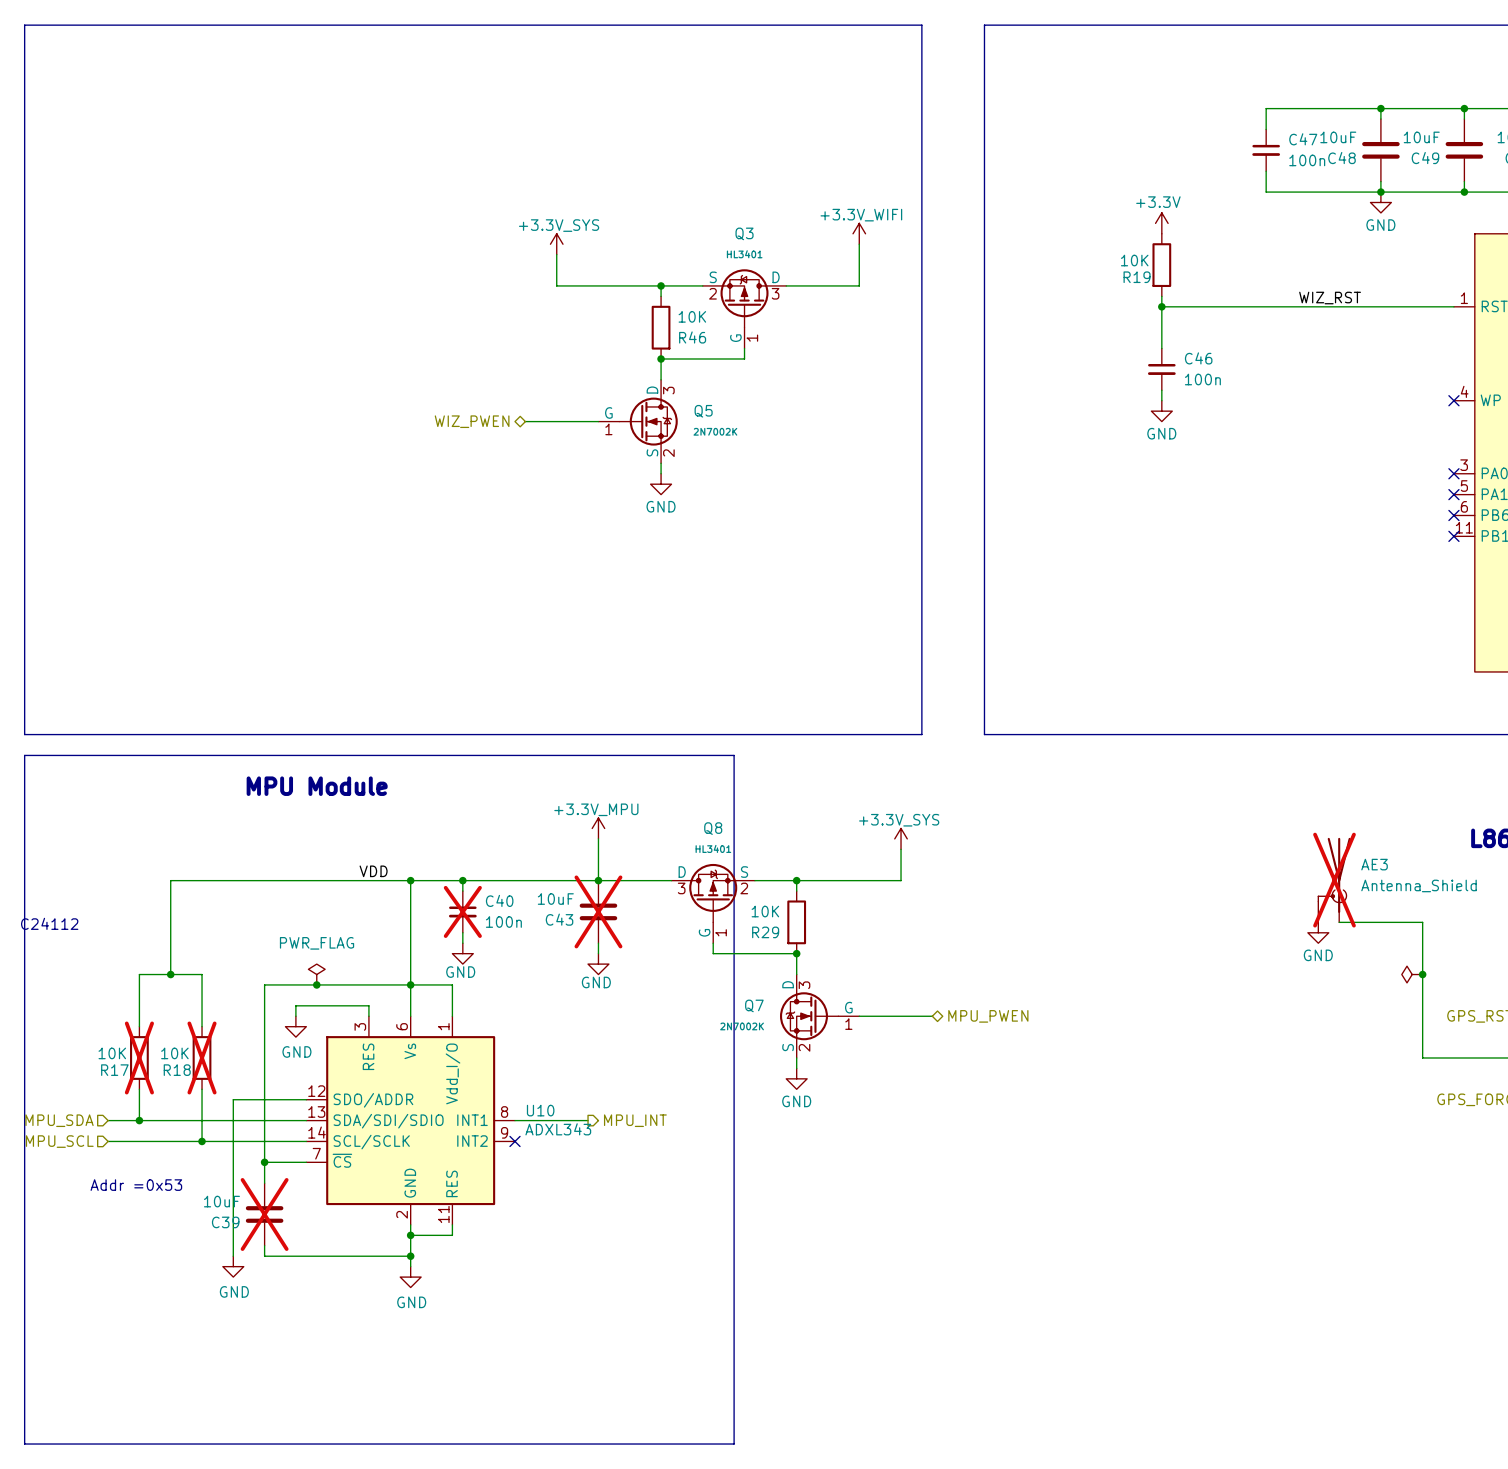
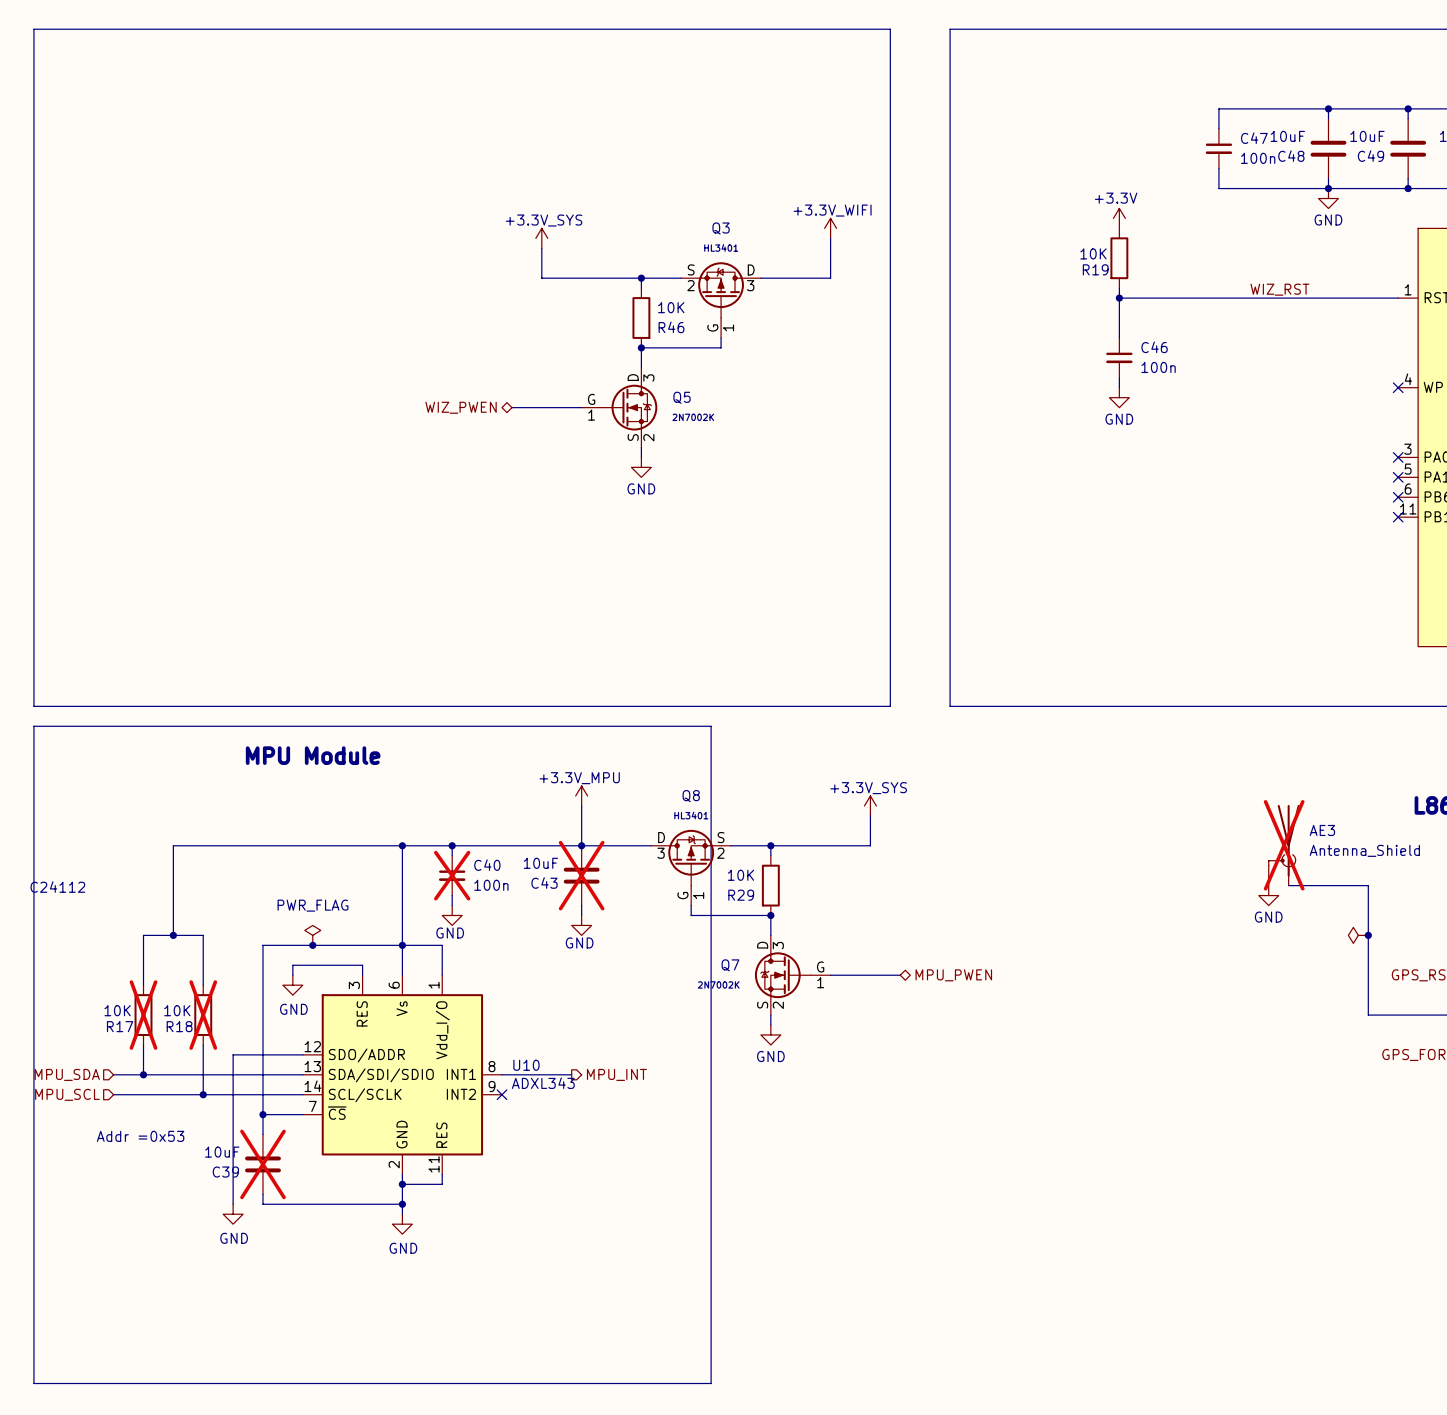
label: VDD (373, 871) -> none

